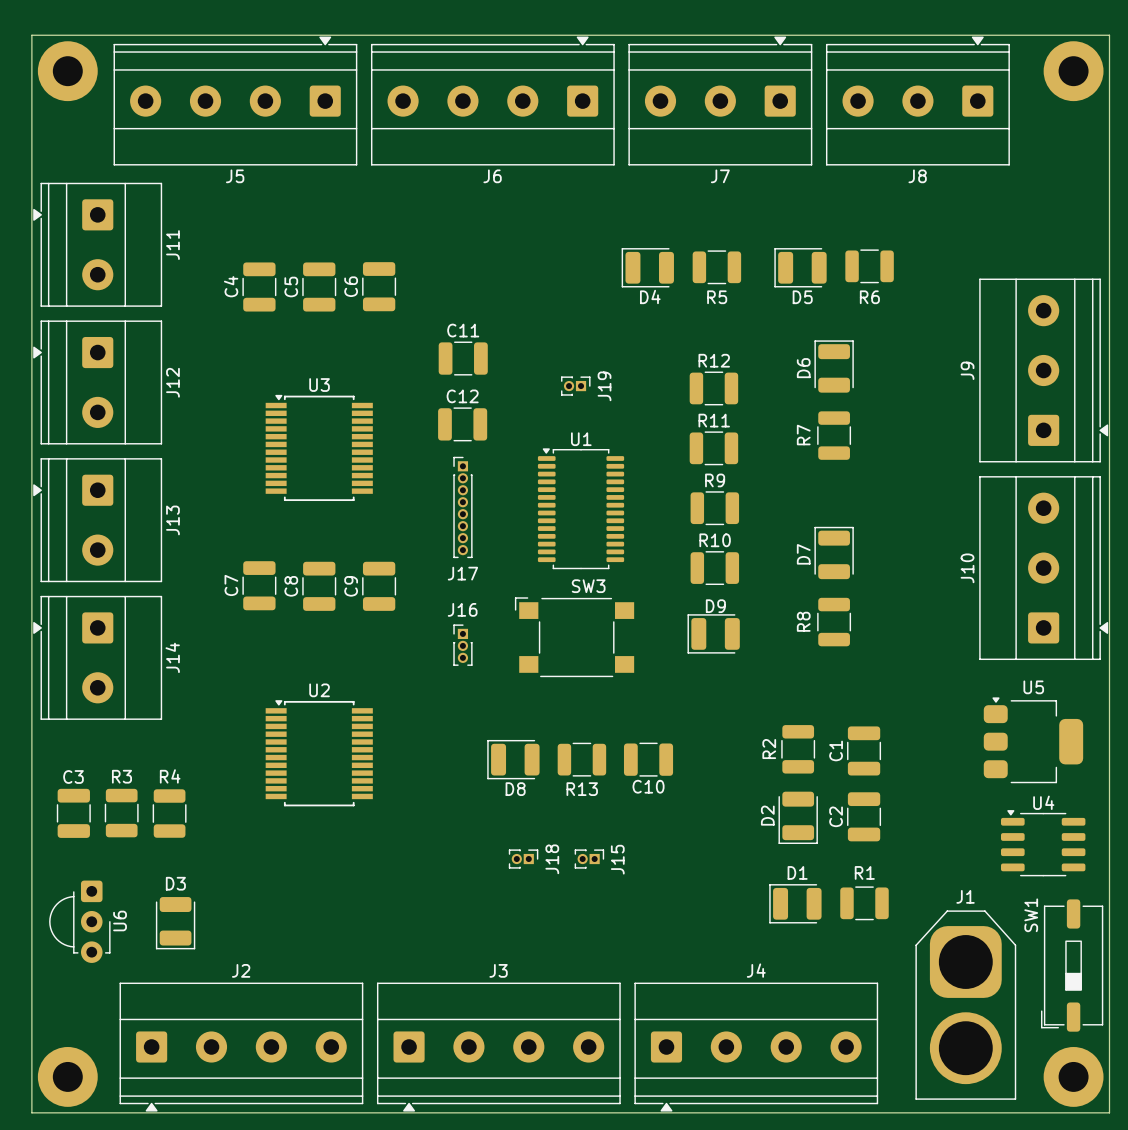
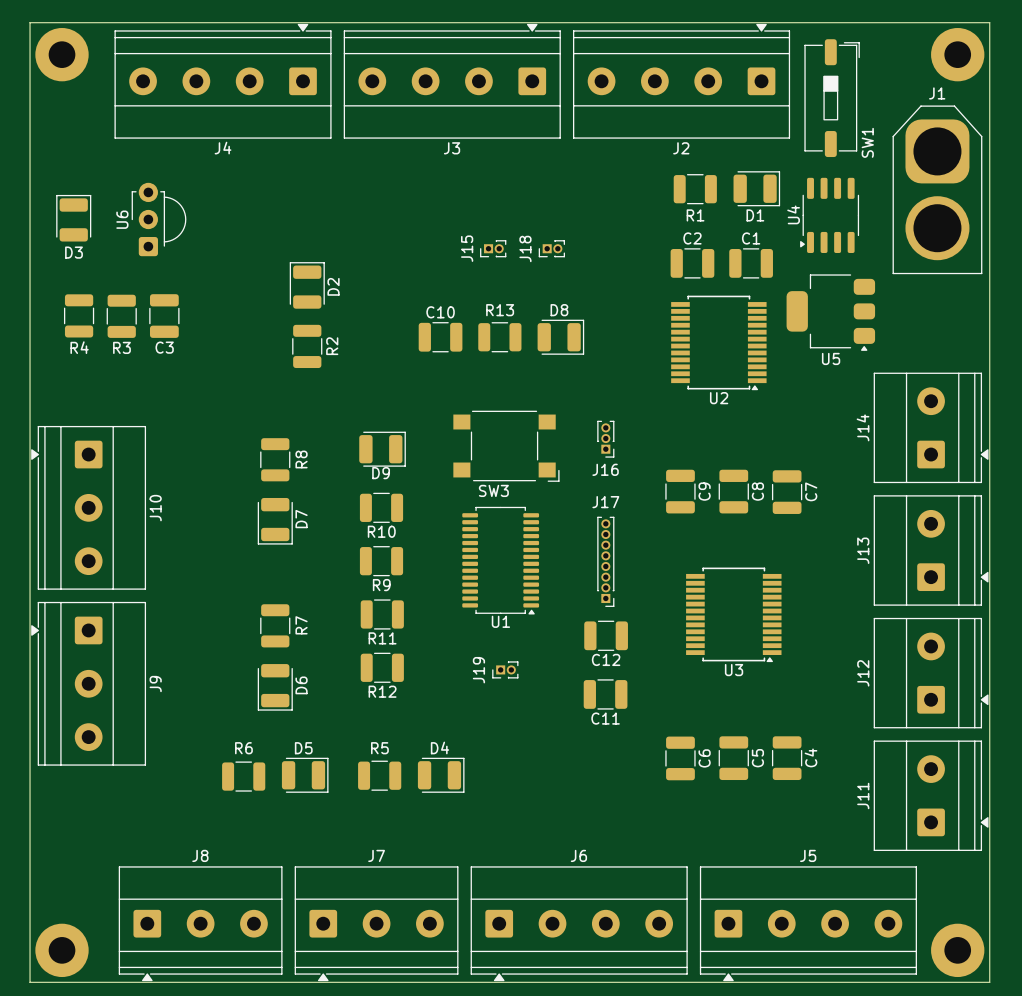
J5 rotation: 0° (235, 101) -> 180° (808, 923)
J5 position: (235, 101) -> (808, 923)
J6 rotation: 0° (492, 101) -> 180° (579, 923)
J6 position: (492, 101) -> (579, 923)
J7 rotation: 0° (720, 101) -> 180° (376, 923)
J7 position: (720, 101) -> (376, 923)
J8 rotation: 0° (917, 101) -> 180° (200, 923)
J8 position: (917, 101) -> (200, 923)
J11 rotation: 0° (97, 244) -> 180° (931, 795)
J11 position: (97, 244) -> (931, 795)
R6 position: (869, 266) -> (243, 776)
D4 rotation: 0° (647, 267) -> 180° (441, 775)
D4 position: (647, 267) -> (441, 775)
R5 position: (716, 267) -> (379, 775)
D5 rotation: 0° (800, 267) -> 180° (305, 775)
D5 position: (800, 267) -> (305, 775)
C4 name position: C4 (231, 286) -> C4 (810, 757)
C4 position: (259, 286) -> (787, 758)
C5 name position: C5 (291, 286) -> C5 (757, 758)
C5 position: (319, 286) -> (733, 758)
C6 name position: C6 (351, 286) -> C6 (704, 758)
C6 position: (379, 286) -> (680, 758)
R5 name position: R5 (717, 297) -> R5 (379, 748)
R6 name position: R6 (869, 297) -> R6 (243, 748)
C11 name position: C11 (463, 330) -> C11 (605, 718)
C11 position: (463, 358) -> (605, 694)
R12 name position: R12 (714, 360) -> R12 (382, 691)
D6 rotation: 0° (834, 366) -> 180° (275, 687)
D6 position: (834, 366) -> (275, 687)
J9 rotation: 0° (1043, 370) -> 180° (88, 683)
J9 position: (1043, 370) -> (88, 683)
J12 rotation: 0° (97, 382) -> 180° (931, 673)
J12 position: (97, 382) -> (931, 673)
J19 rotation: 0° (575, 386) -> 180° (505, 669)
J19 position: (575, 386) -> (505, 669)
R12 position: (713, 388) -> (382, 667)
C12 name position: C12 (462, 396) -> C12 (606, 659)
R11 name position: R11 (714, 420) -> R11 (382, 638)
C12 position: (462, 424) -> (606, 635)
R7 name position: R7 (803, 435) -> R7 (301, 625)
R7 position: (834, 435) -> (275, 625)
U3 rotation: 0° (319, 447) -> 180° (733, 614)
U3 position: (319, 447) -> (733, 614)
R11 position: (713, 448) -> (382, 614)
R9 name position: R9 (715, 480) -> R9 (381, 585)
J17 rotation: 0° (462, 507) -> 180° (605, 561)
J17 position: (462, 507) -> (605, 561)
U1 rotation: 0° (581, 508) -> 180° (500, 560)
U1 position: (581, 508) -> (500, 560)
R9 position: (714, 508) -> (381, 561)
J13 rotation: 0° (97, 520) -> 180° (931, 550)
J13 position: (97, 520) -> (931, 550)
R10 name position: R10 (715, 540) -> R10 (381, 531)
D7 rotation: 0° (834, 552) -> 180° (275, 521)
D7 position: (834, 552) -> (275, 521)
R10 position: (714, 568) -> (381, 507)
J10 rotation: 0° (1043, 568) -> 180° (88, 507)
J10 position: (1043, 568) -> (88, 507)
C7 name position: C7 (231, 585) -> C7 (811, 491)
C7 position: (259, 585) -> (787, 492)
C8 name position: C8 (291, 586) -> C8 (757, 491)
C8 position: (319, 586) -> (733, 491)
C9 name position: C9 (351, 586) -> C9 (704, 491)
C9 position: (379, 586) -> (680, 491)
R8 name position: R8 (803, 621) -> R8 (301, 459)
R8 position: (834, 622) -> (275, 459)
D9 rotation: 0° (713, 633) -> 180° (382, 449)
D9 position: (713, 633) -> (382, 449)
SW3 rotation: 0° (574, 637) -> 180° (506, 446)
SW3 position: (574, 637) -> (506, 446)
J16 rotation: 0° (462, 645) -> 180° (605, 439)
J16 position: (462, 645) -> (605, 439)
J14 rotation: 0° (97, 657) -> 180° (931, 427)
J14 position: (97, 657) -> (931, 427)
U5 rotation: 0° (1033, 740) -> 180° (830, 312)
U5 position: (1033, 740) -> (830, 312)
R2 name position: R2 (769, 749) -> R2 (332, 346)
R2 position: (798, 749) -> (307, 346)
C1 rotation: 0° (864, 750) -> 90° clockwise (751, 263)
C1 position: (864, 750) -> (751, 263)
U2 rotation: 0° (319, 753) -> 180° (718, 342)
U2 position: (319, 753) -> (718, 342)
D8 rotation: 0° (513, 759) -> 180° (560, 337)
D8 position: (513, 759) -> (560, 337)
R13 position: (581, 759) -> (499, 337)
C10 position: (648, 759) -> (440, 337)
R3 name position: R3 (121, 776) -> R3 (121, 347)
R4 name position: R4 (170, 776) -> R4 (79, 347)
C3 name position: C3 (73, 777) -> C3 (164, 347)
C10 name position: C10 (648, 786) -> C10 (440, 312)
R13 name position: R13 (582, 789) -> R13 (500, 310)
C3 position: (73, 813) -> (164, 316)
R3 position: (121, 813) -> (121, 316)
R4 position: (169, 813) -> (79, 315)
C2 rotation: 0° (864, 816) -> 90° clockwise (692, 263)
C2 position: (864, 816) -> (692, 263)
D2 rotation: 0° (798, 817) -> 180° (307, 285)
D2 position: (798, 817) -> (307, 285)
U4 rotation: 0° (1043, 843) -> 90° counterclockwise (829, 215)
U4 position: (1043, 843) -> (829, 215)
J18 rotation: 0° (523, 859) -> 180° (551, 248)
J18 position: (523, 859) -> (551, 248)
J15 rotation: 0° (589, 859) -> 180° (493, 248)
J15 position: (589, 859) -> (493, 248)
R1 name position: R1 (864, 872) -> R1 (695, 215)
D1 rotation: 0° (795, 903) -> 180° (756, 188)
D1 position: (795, 903) -> (756, 188)
R1 position: (864, 903) -> (695, 189)
U6 rotation: 0° (79, 921) -> 180° (159, 219)
U6 position: (79, 921) -> (159, 219)
D3 rotation: 0° (175, 923) -> 180° (73, 218)
D3 position: (175, 923) -> (73, 218)
SW1 rotation: 0° (1072, 965) -> 180° (832, 98)
SW1 position: (1072, 965) -> (832, 98)
J1 position: (965, 1005) -> (937, 189)
J2 rotation: 0° (241, 1047) -> 180° (681, 81)
J2 position: (241, 1047) -> (681, 81)
J3 rotation: 0° (498, 1047) -> 180° (452, 81)
J3 position: (498, 1047) -> (452, 81)
J4 rotation: 0° (756, 1047) -> 180° (223, 81)
J4 position: (756, 1047) -> (223, 81)

